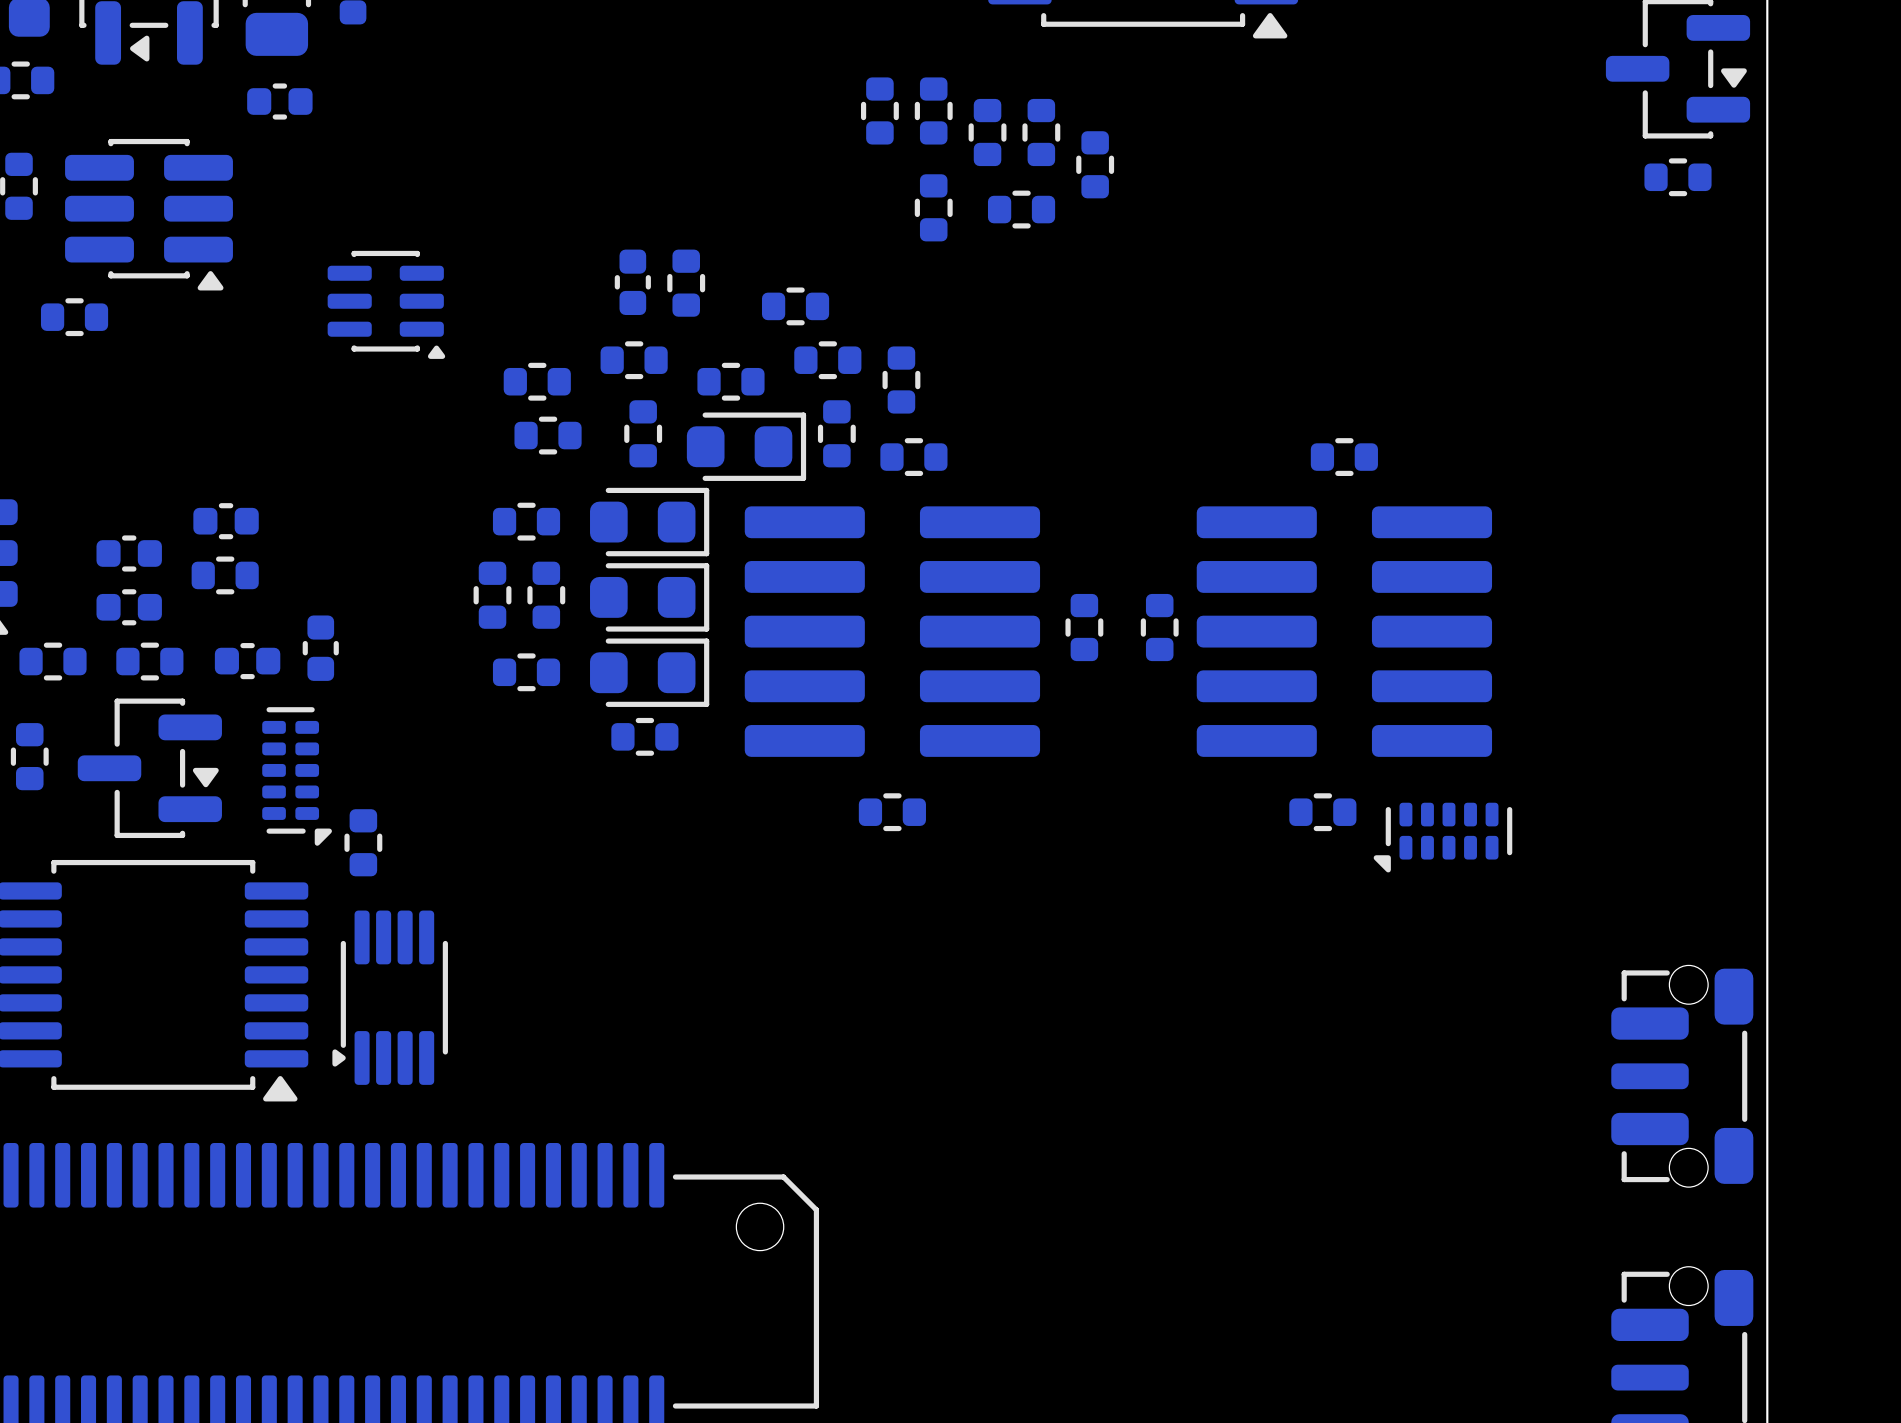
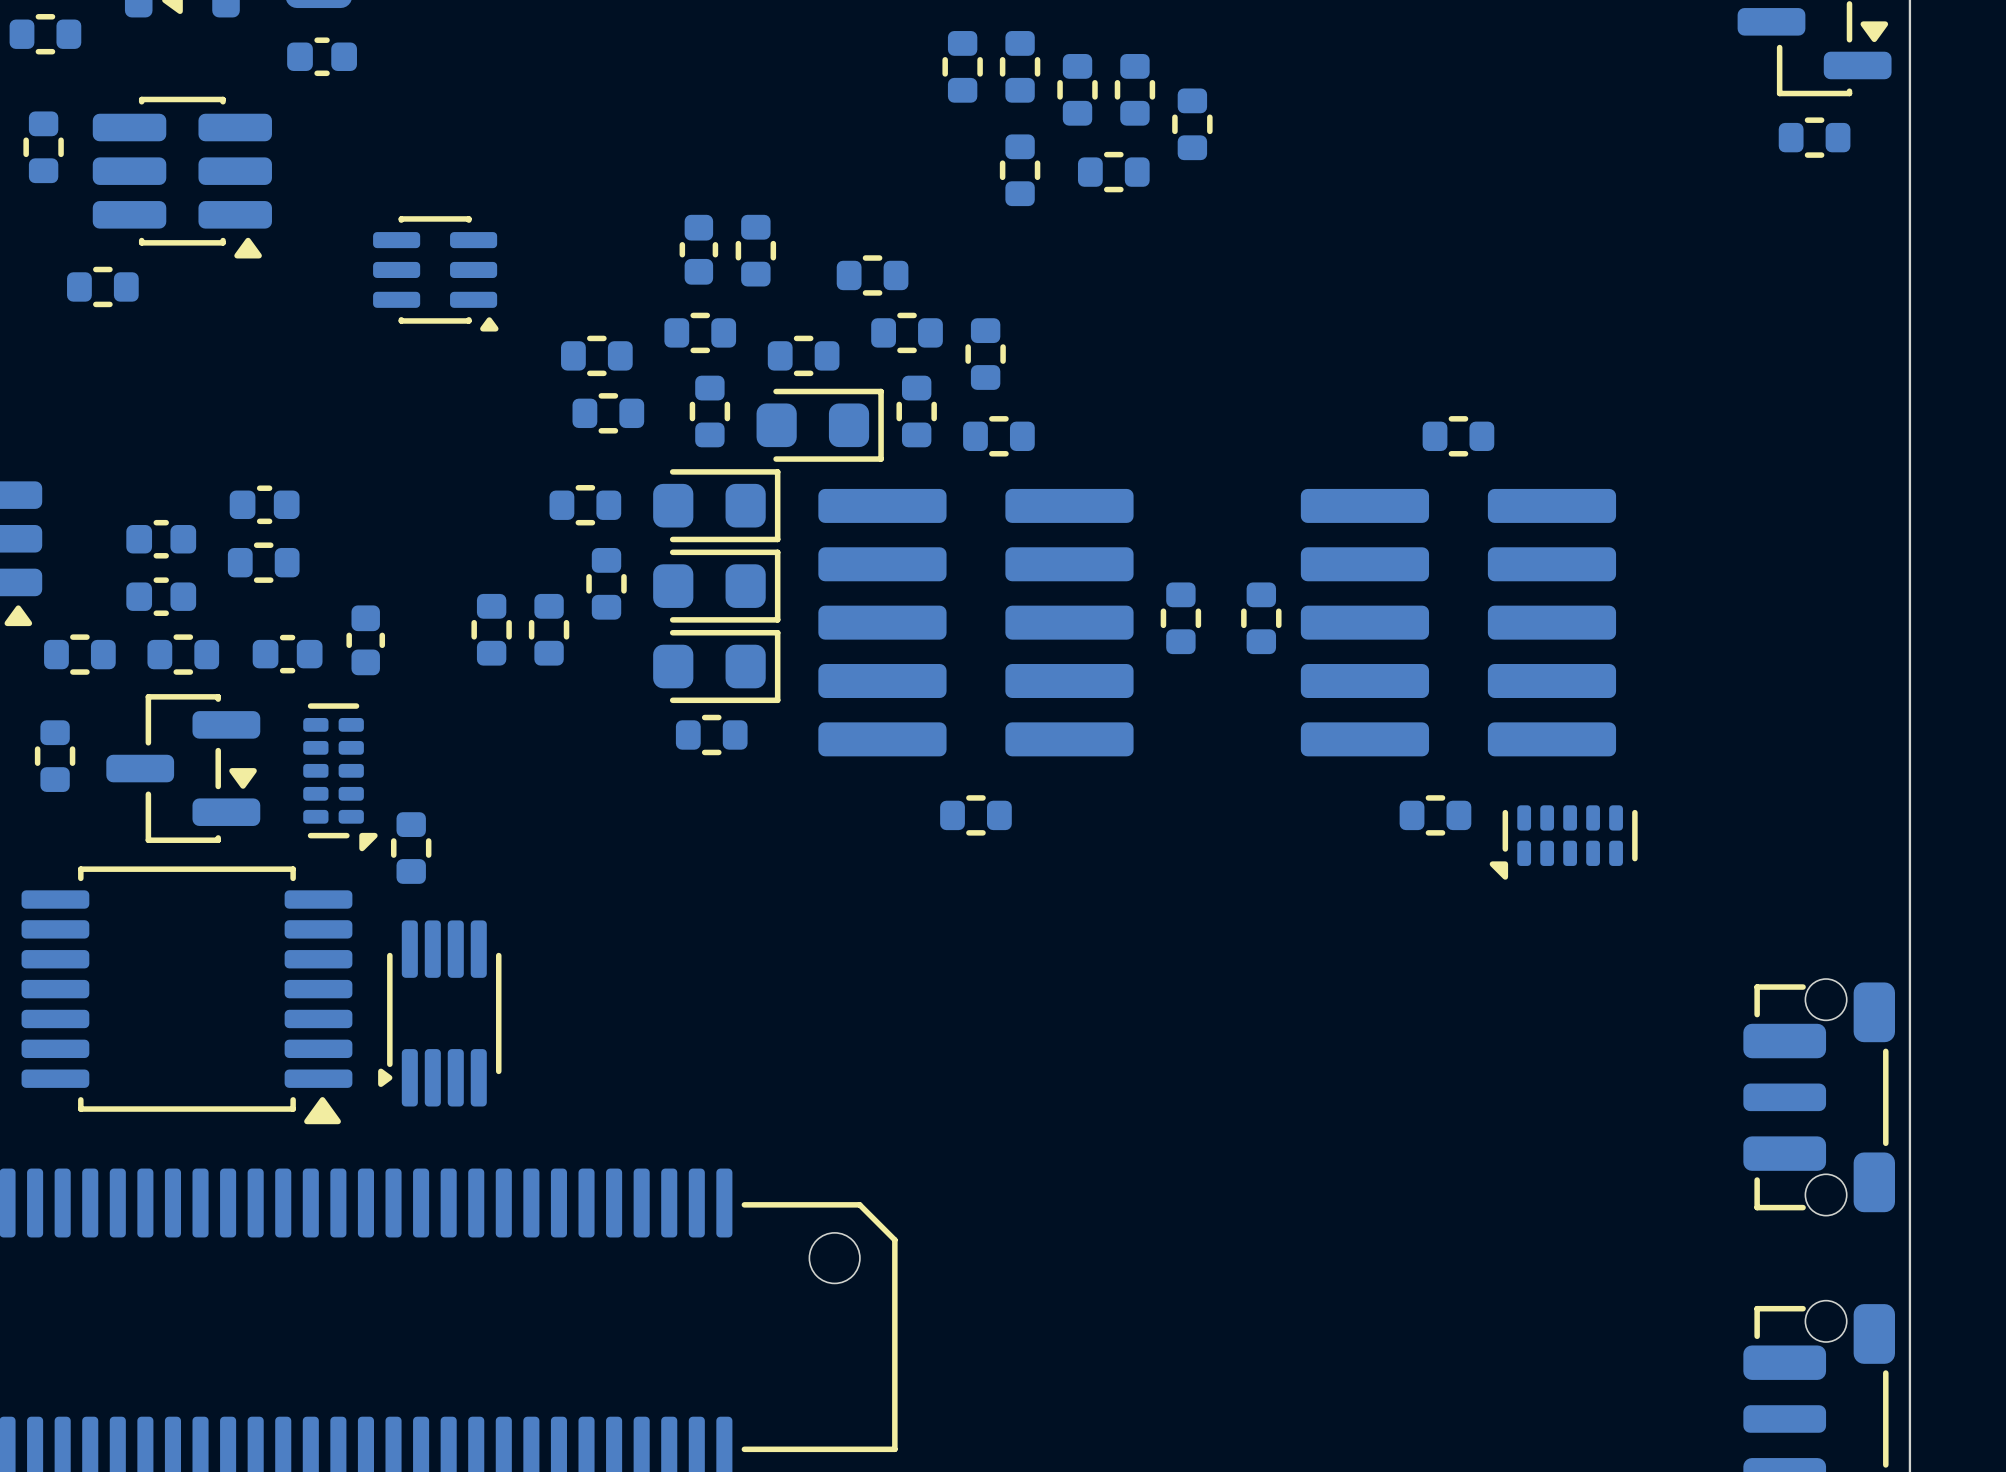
part: (492, 595) -> none
part: none -> (491, 629)
part: none -> (549, 629)
part: (526, 672) -> none

